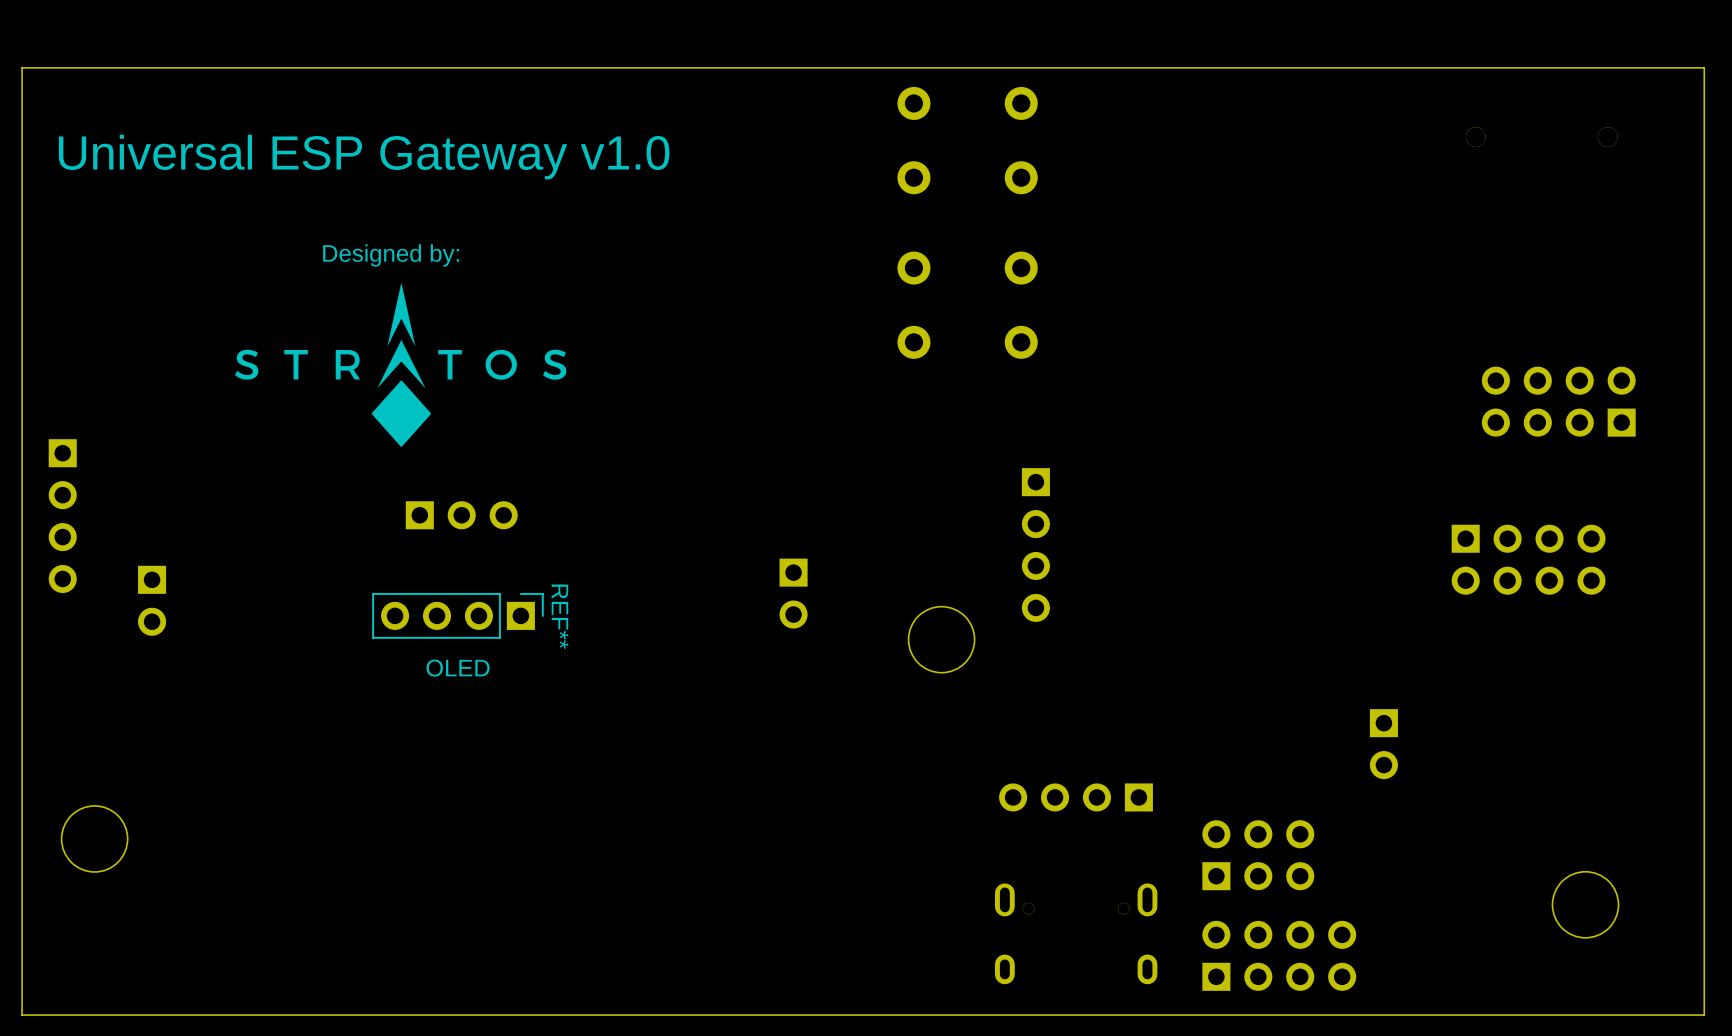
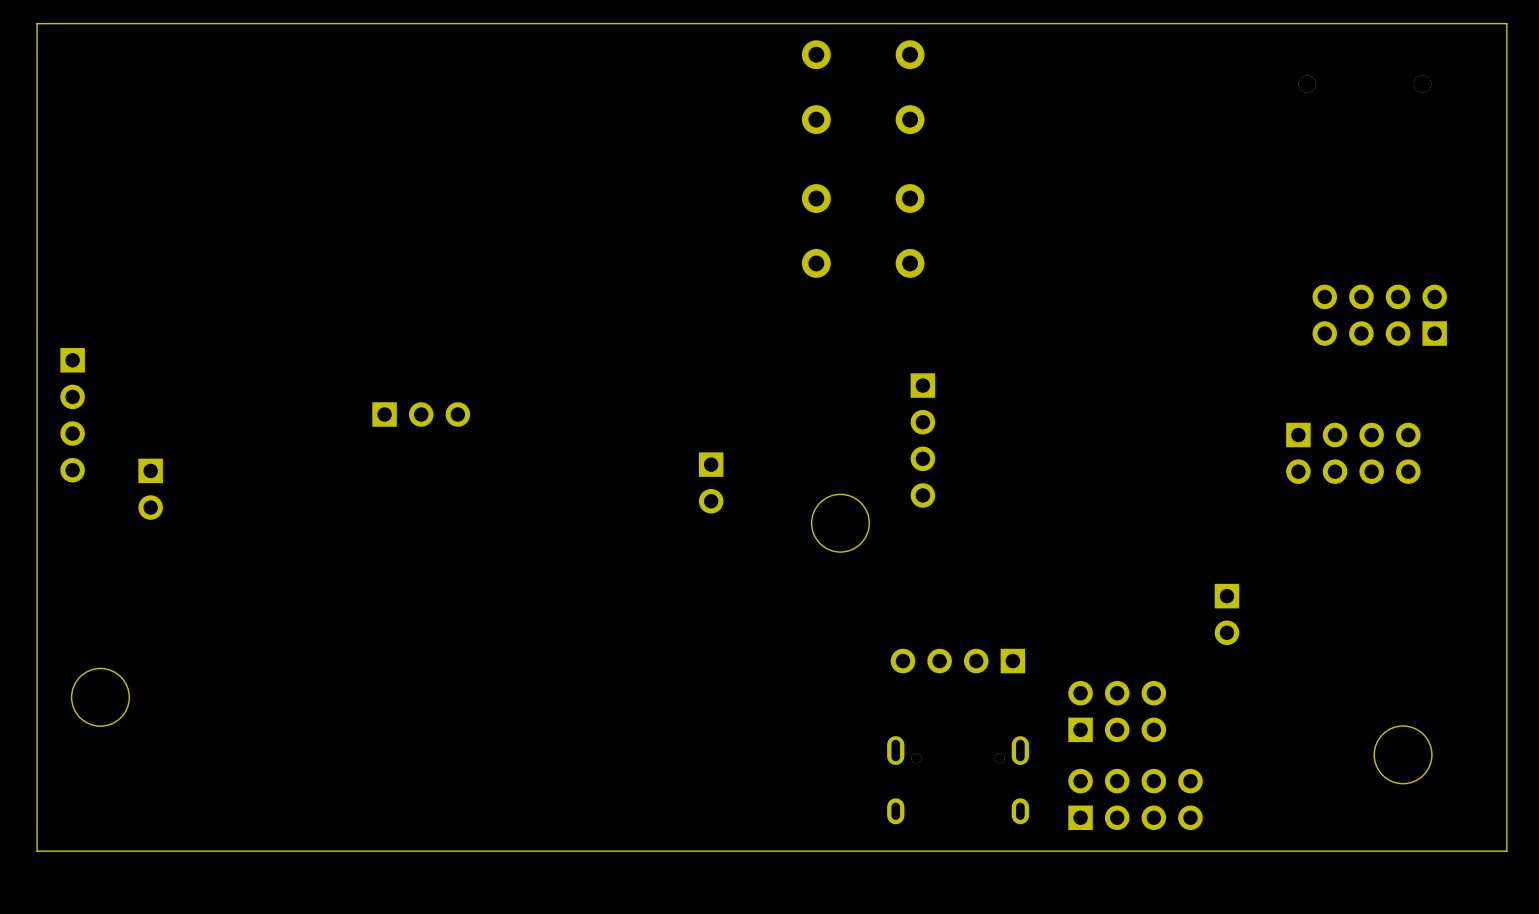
text: Universal ESP Gateway v1.0 (364, 157) -> none
text: Designed by: (391, 255) -> none
drawing: [235, 282, 567, 448] -> none
REF**: (457, 615) -> none
text: OLED (458, 668) -> none

